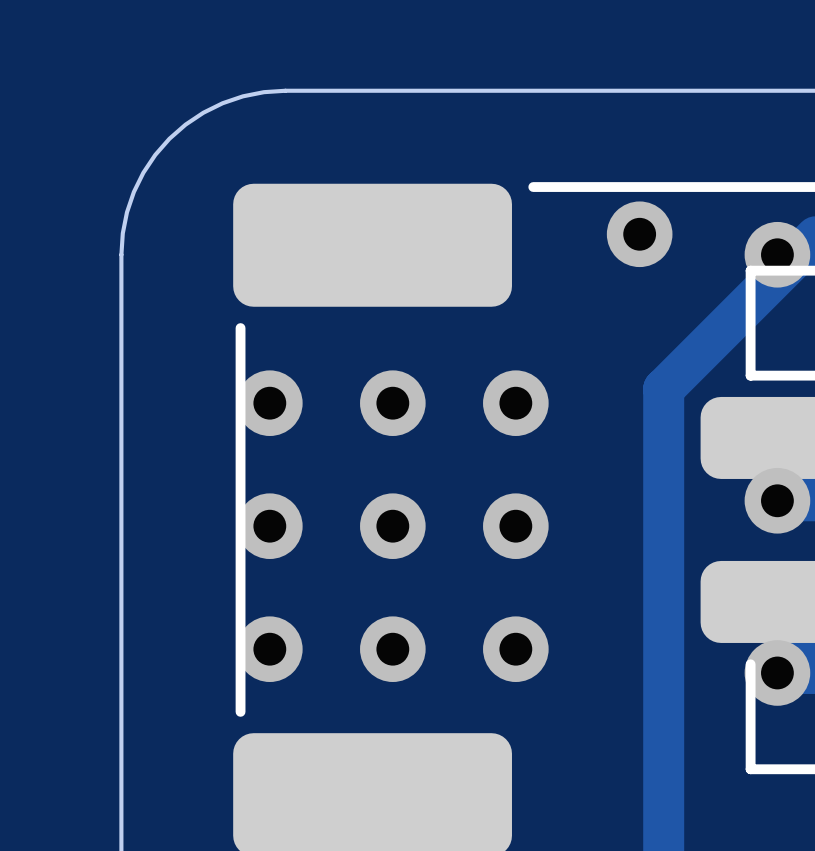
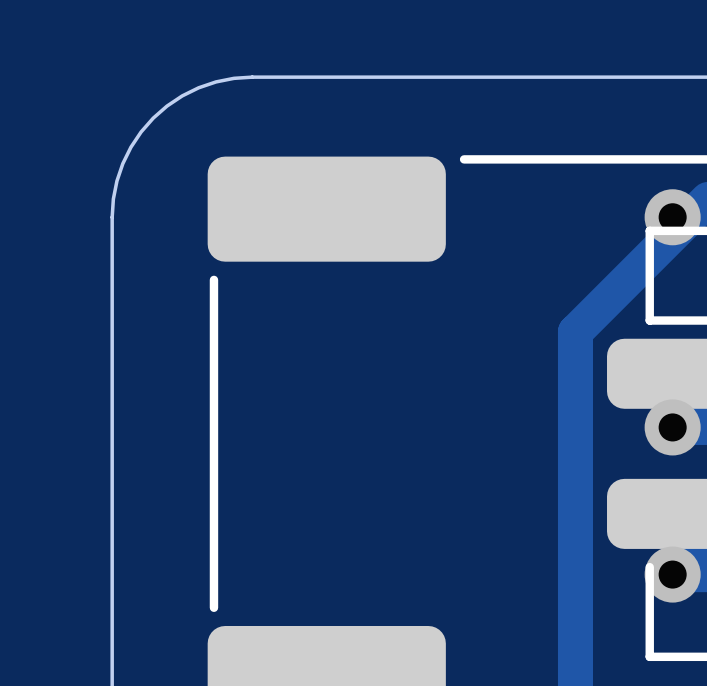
via: (639, 234) -> none
via: (269, 403) -> none
via: (392, 403) -> none
via: (515, 403) -> none
via: (269, 526) -> none
via: (392, 526) -> none
via: (515, 526) -> none
via: (269, 649) -> none
via: (392, 649) -> none
via: (515, 649) -> none

